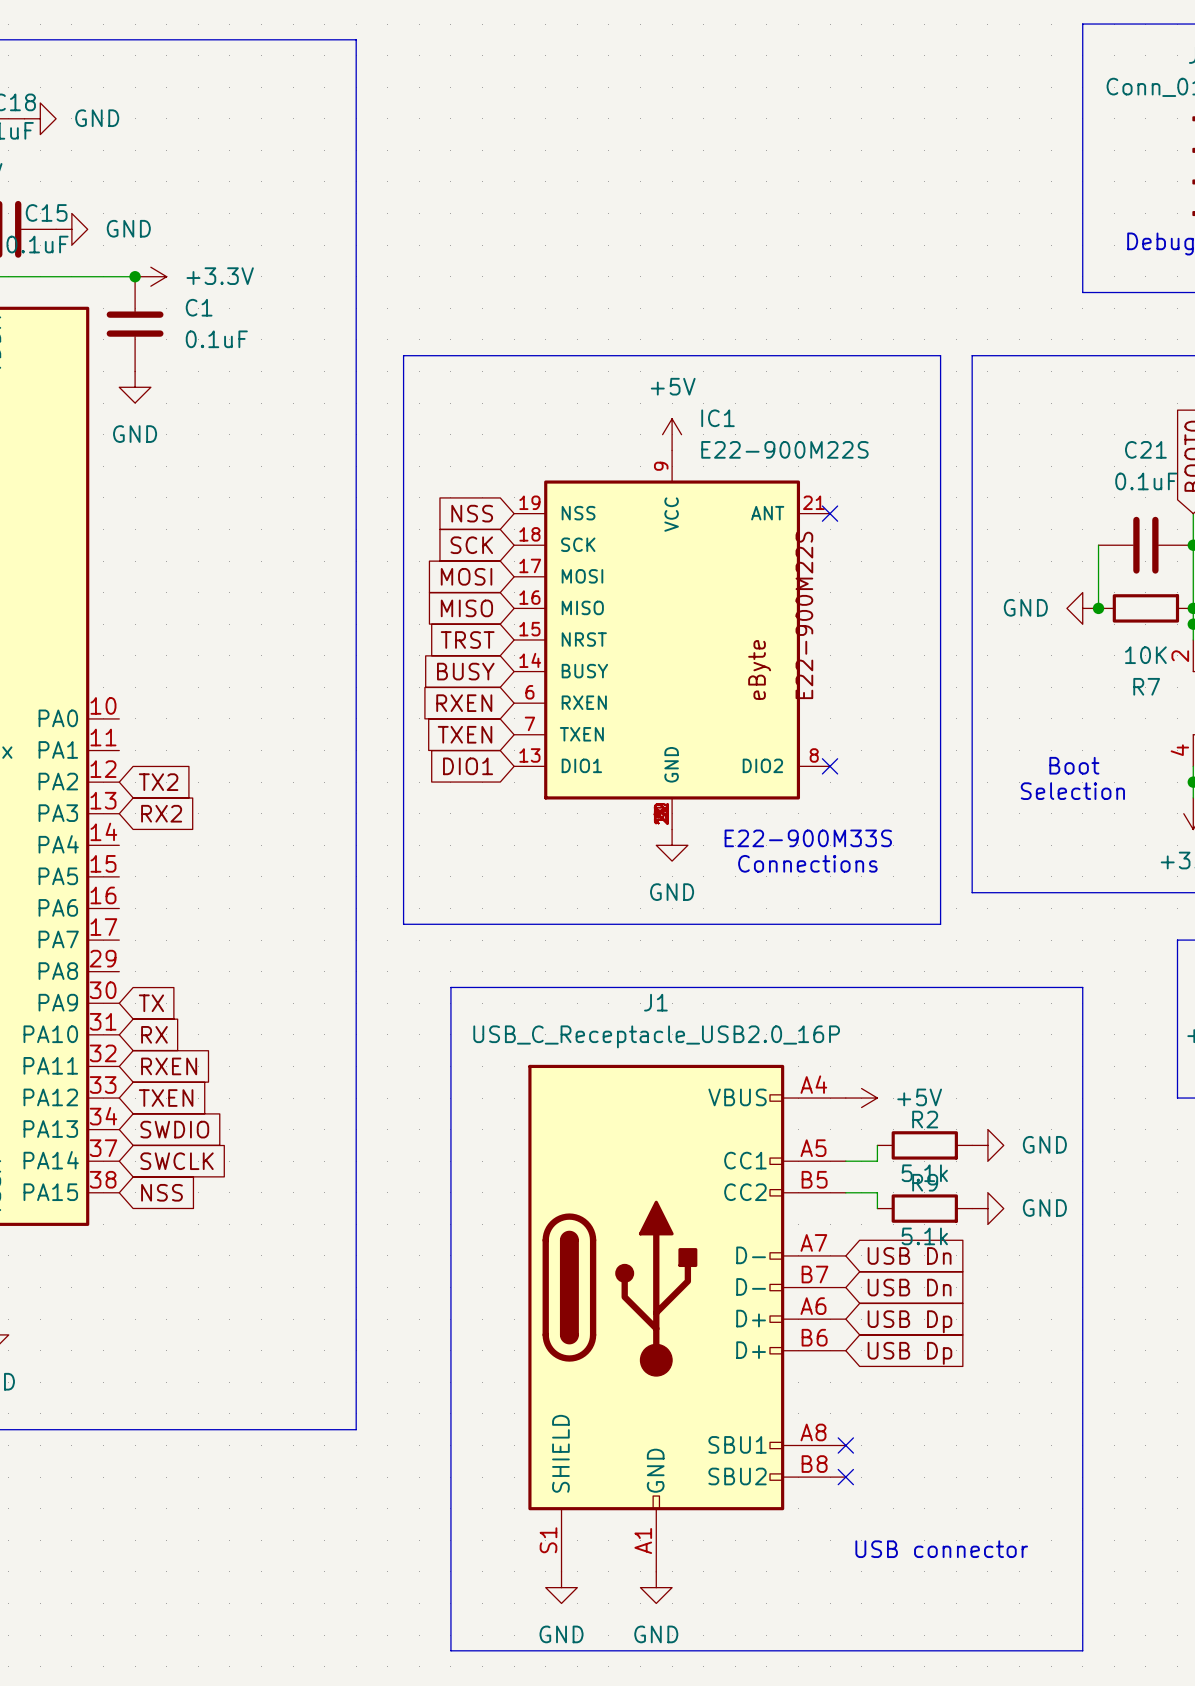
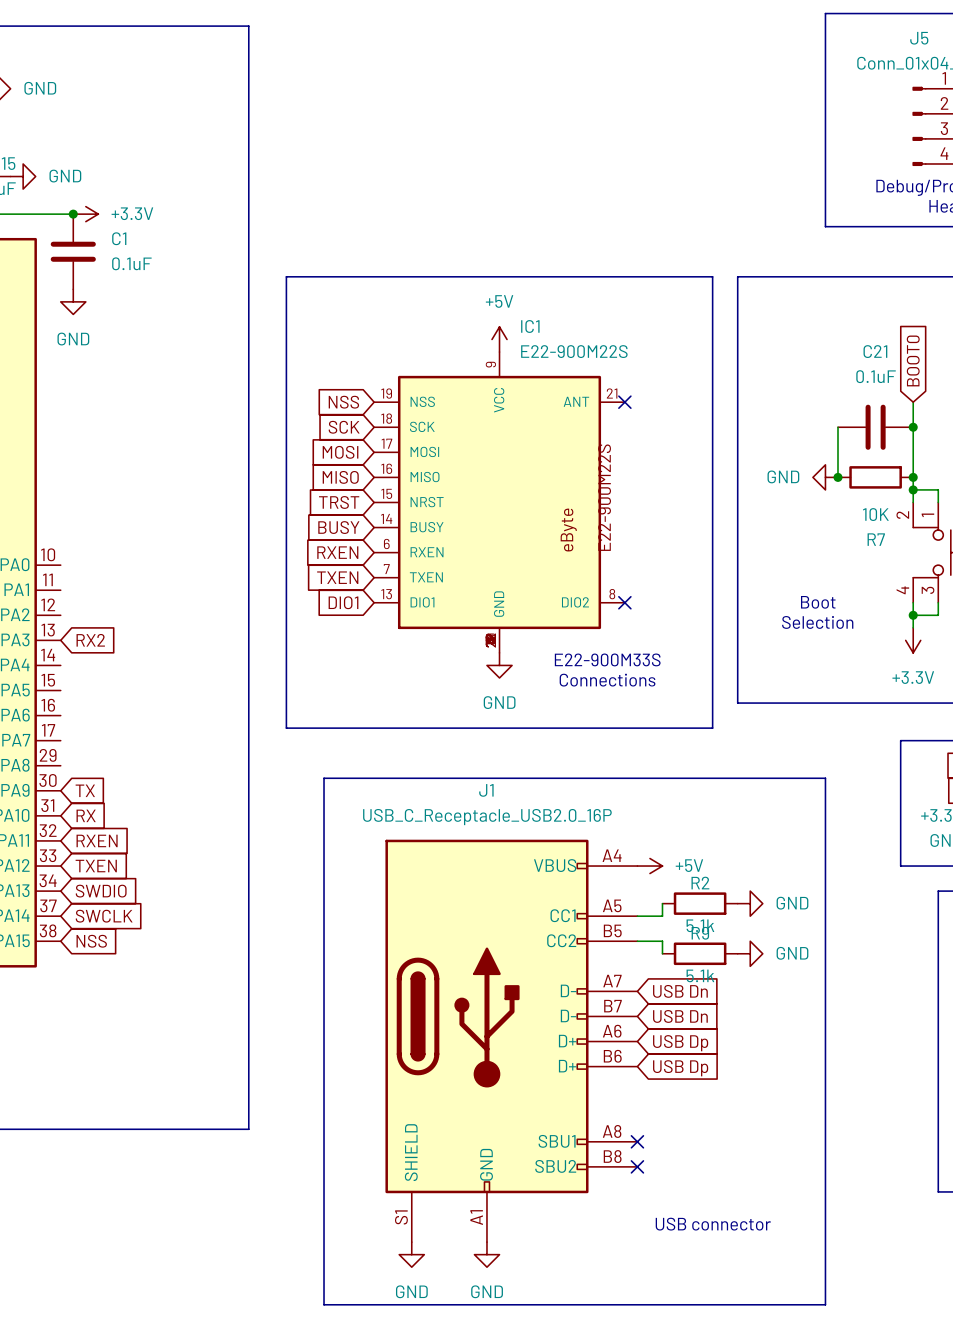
global label: TX2 (158, 782) -> none

